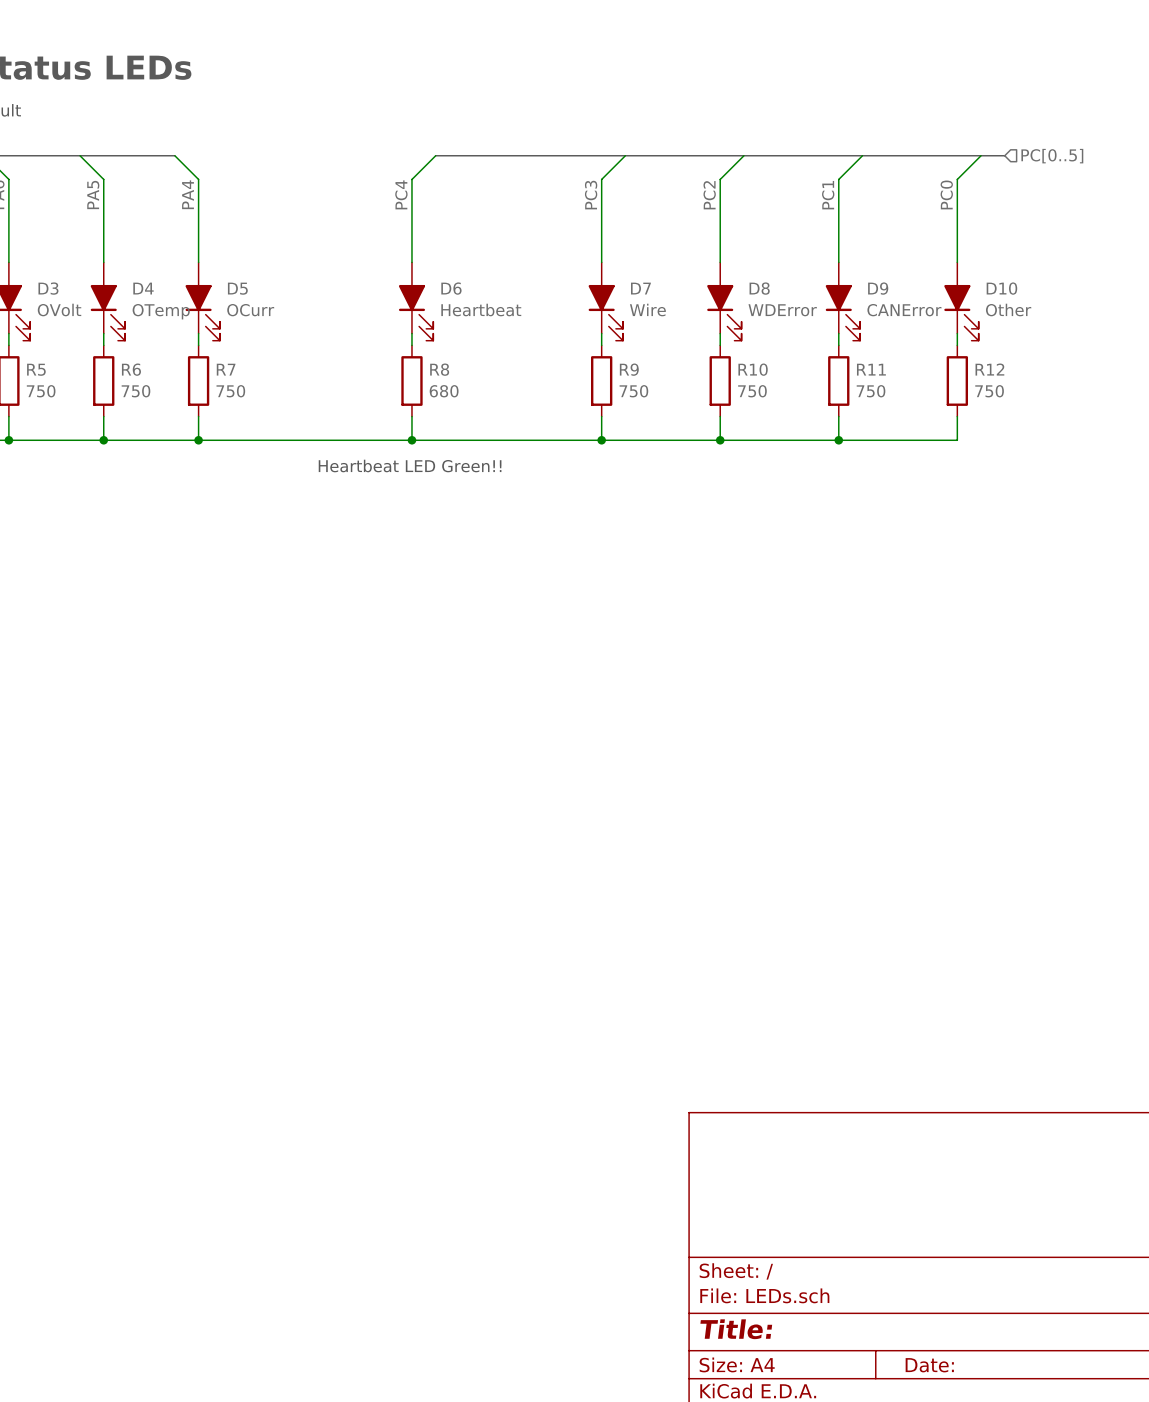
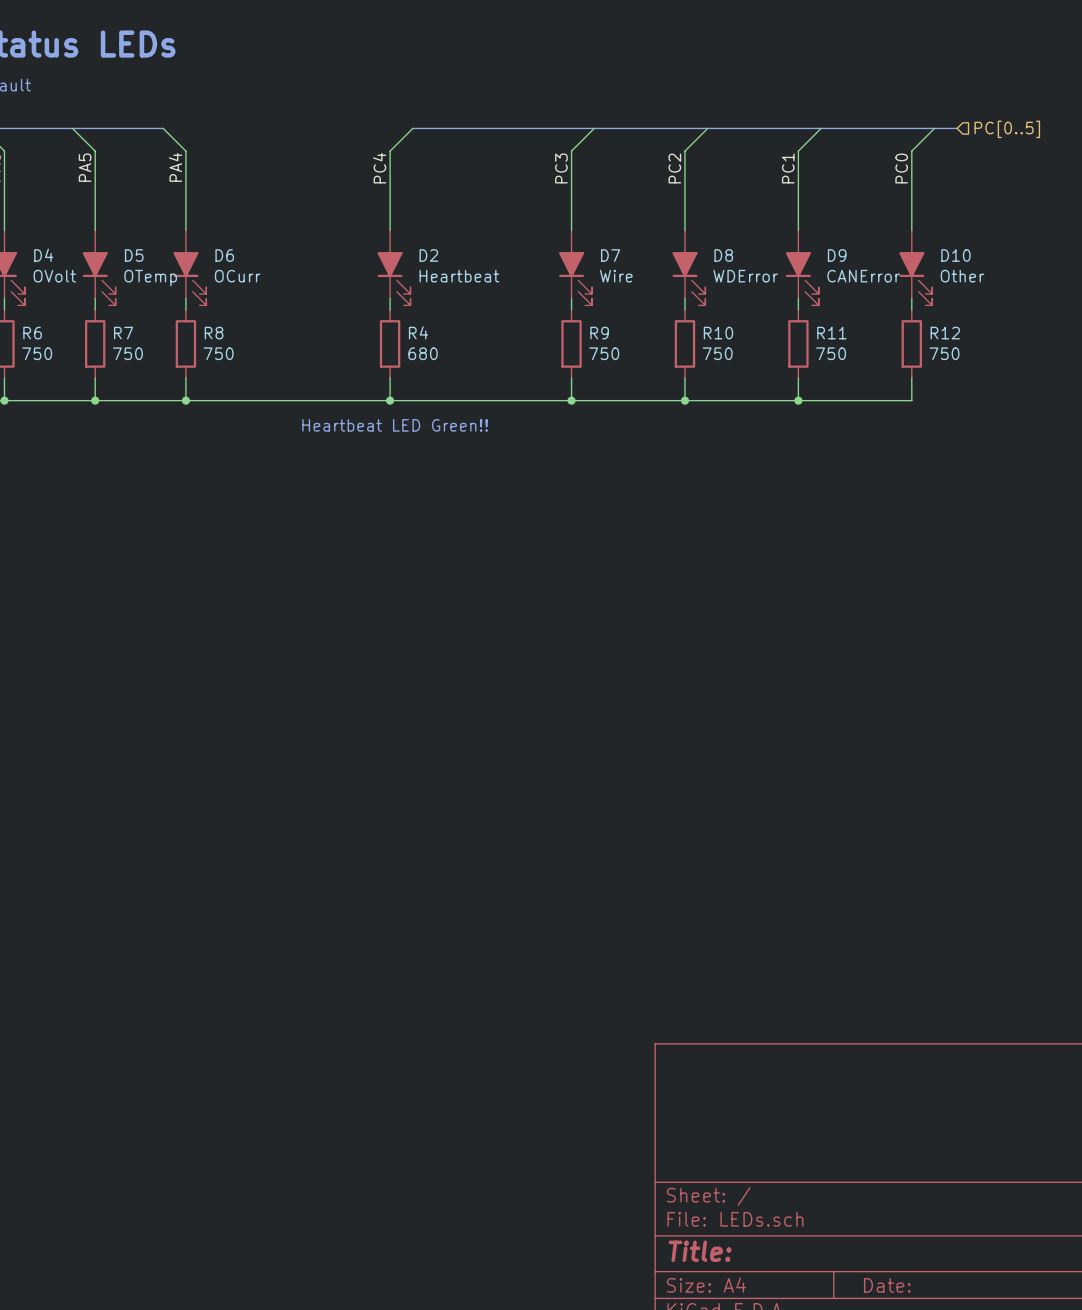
D3 name: D3 (48, 288) -> D4 (43, 255)
D4 name: D4 (143, 288) -> D5 (134, 255)
D5 name: D5 (237, 288) -> D6 (224, 255)
D6 name: D6 (451, 288) -> D2 (428, 255)
R5 name: R5 (36, 369) -> R6 (32, 333)
R6 name: R6 (131, 369) -> R7 (123, 333)
R7 name: R7 (226, 369) -> R8 (214, 333)
R8 name: R8 (439, 369) -> R4 (418, 332)

